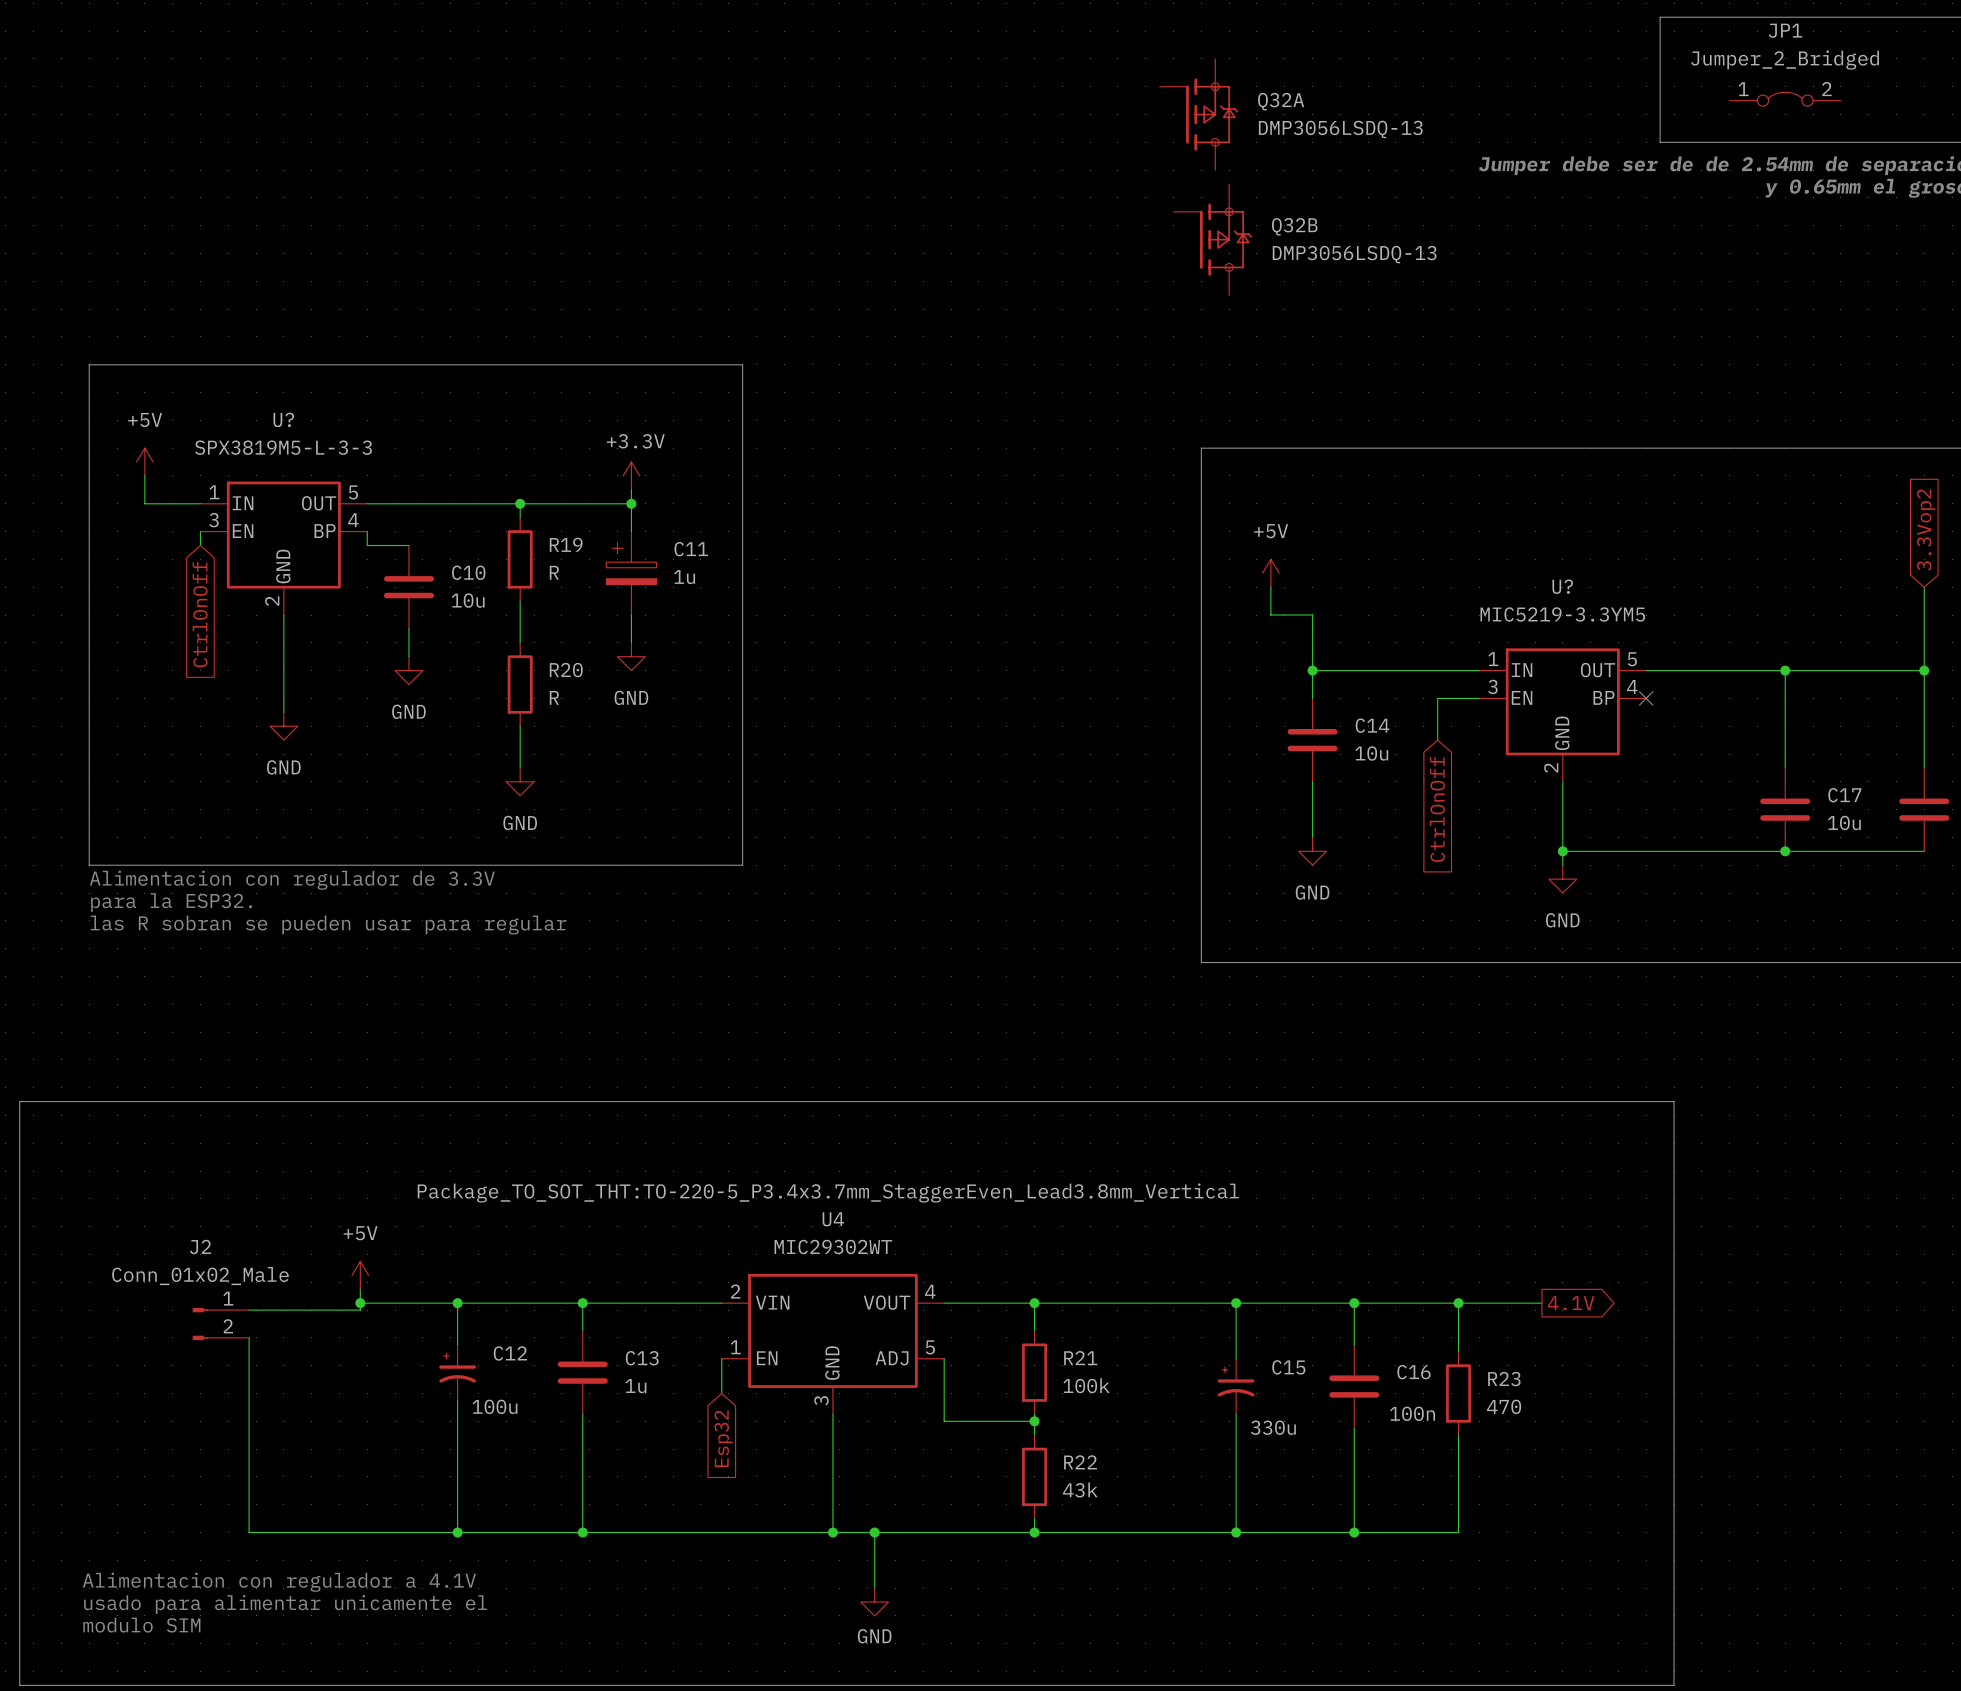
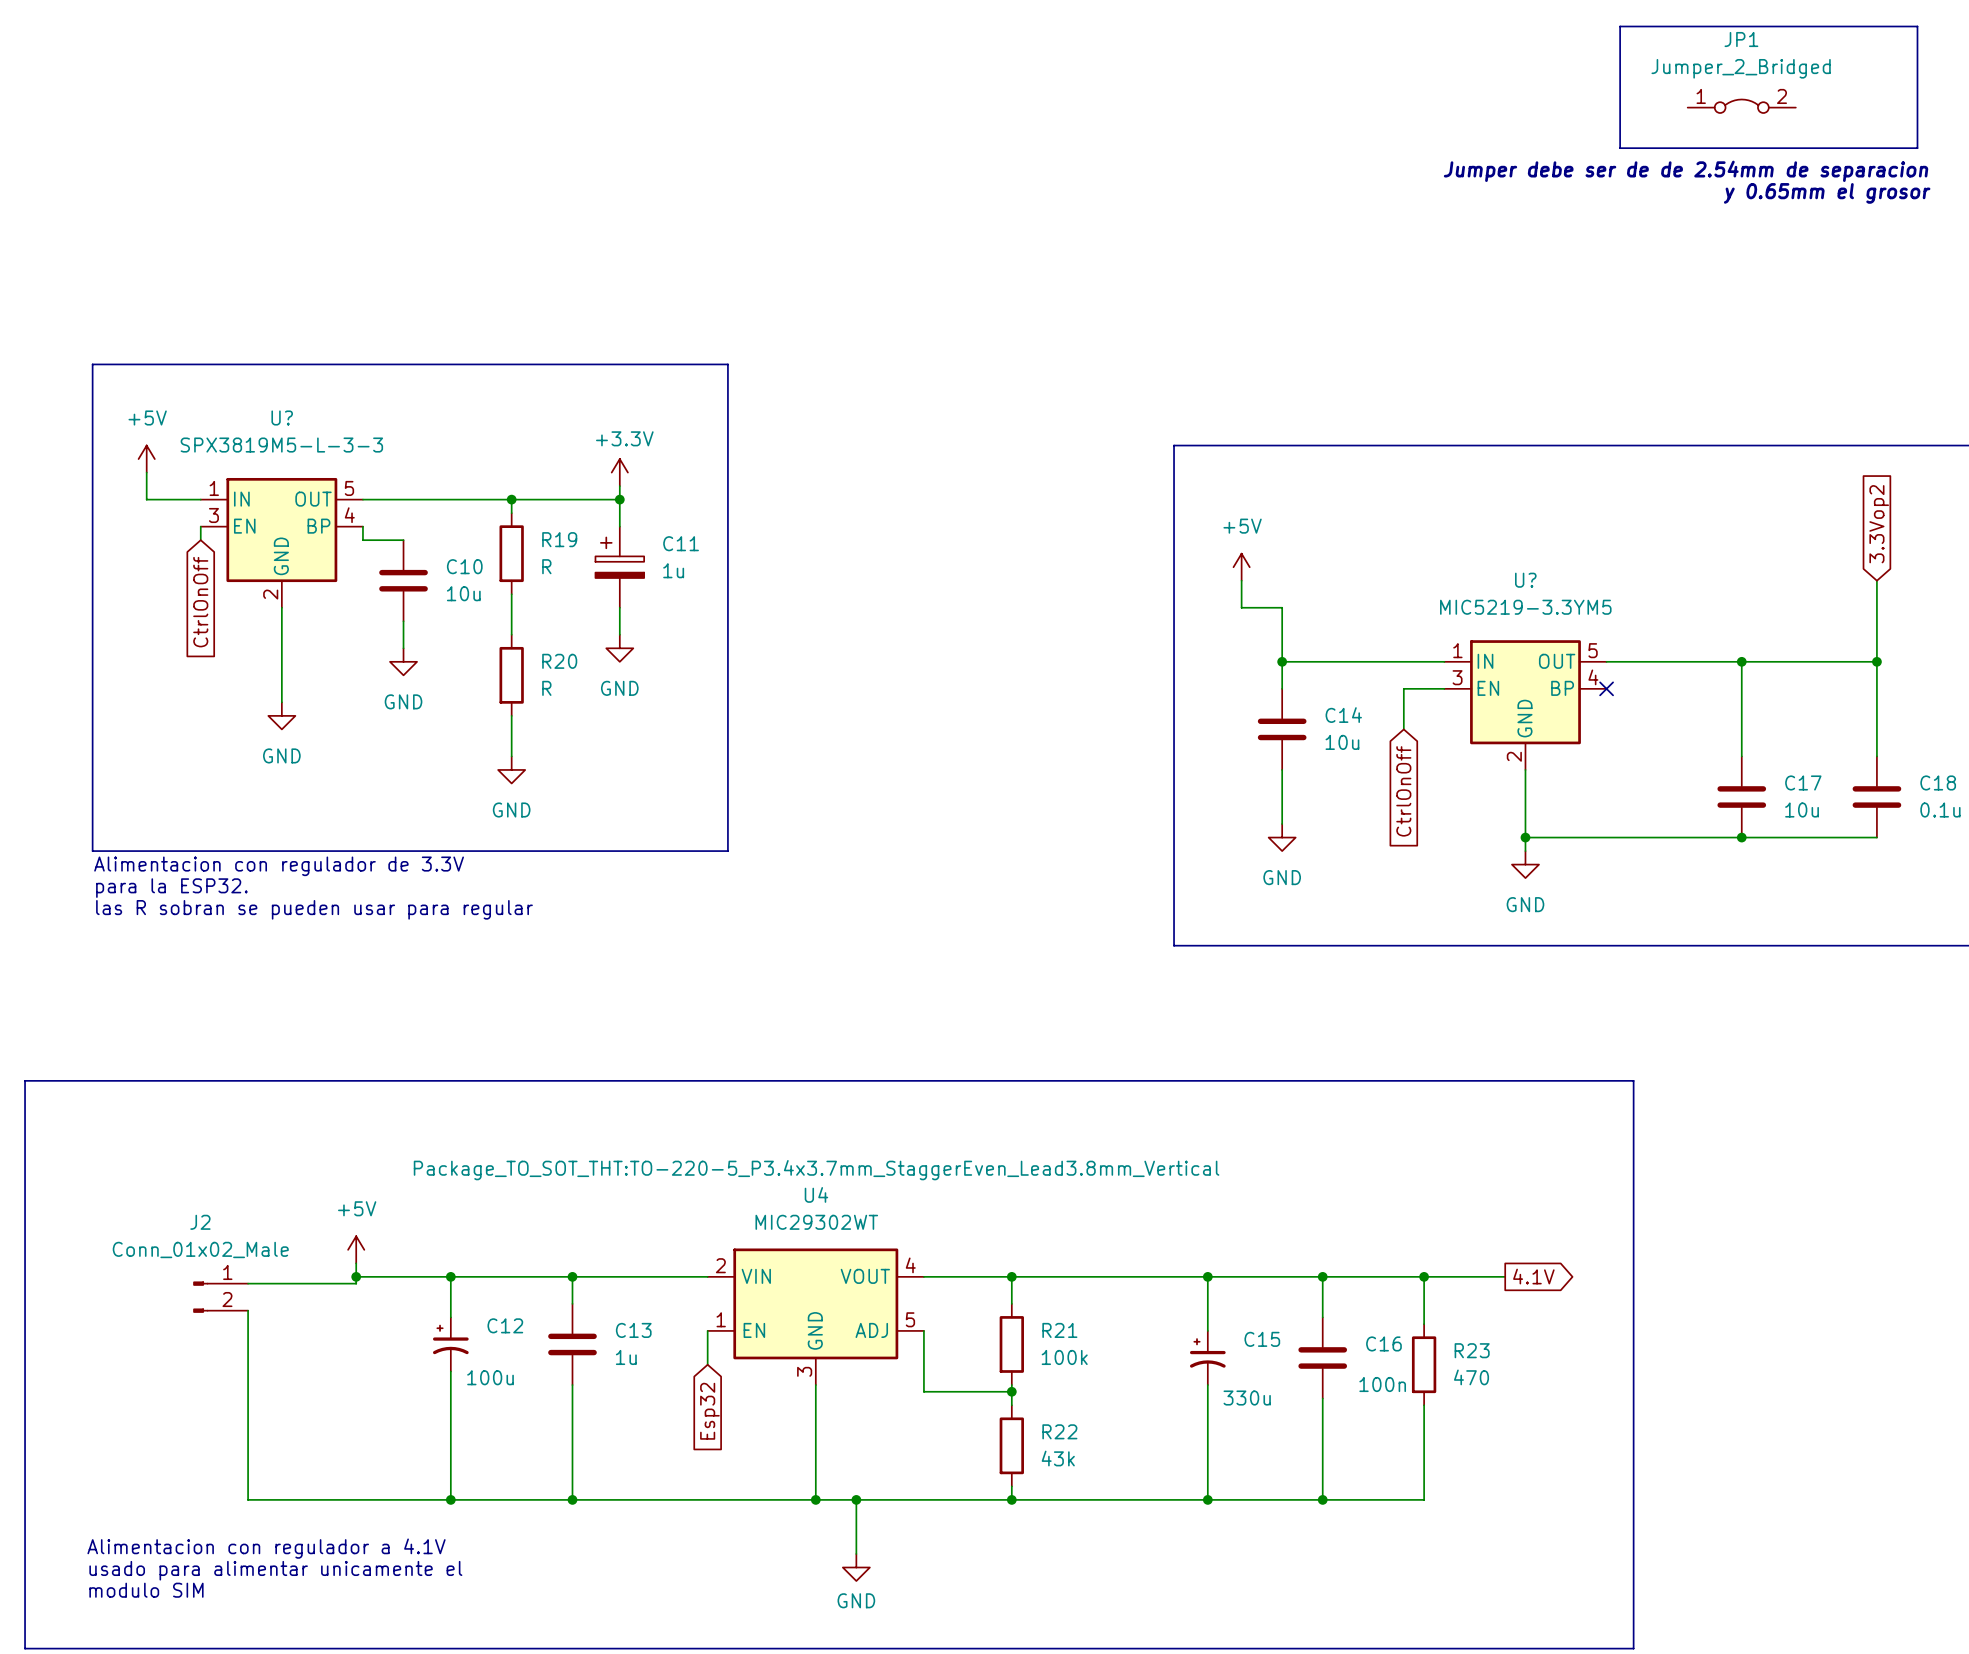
Q32A: DMP3056LSDQ-13 (1199, 114) -> none
Q32B: DMP3056LSDQ-13 (1212, 239) -> none

